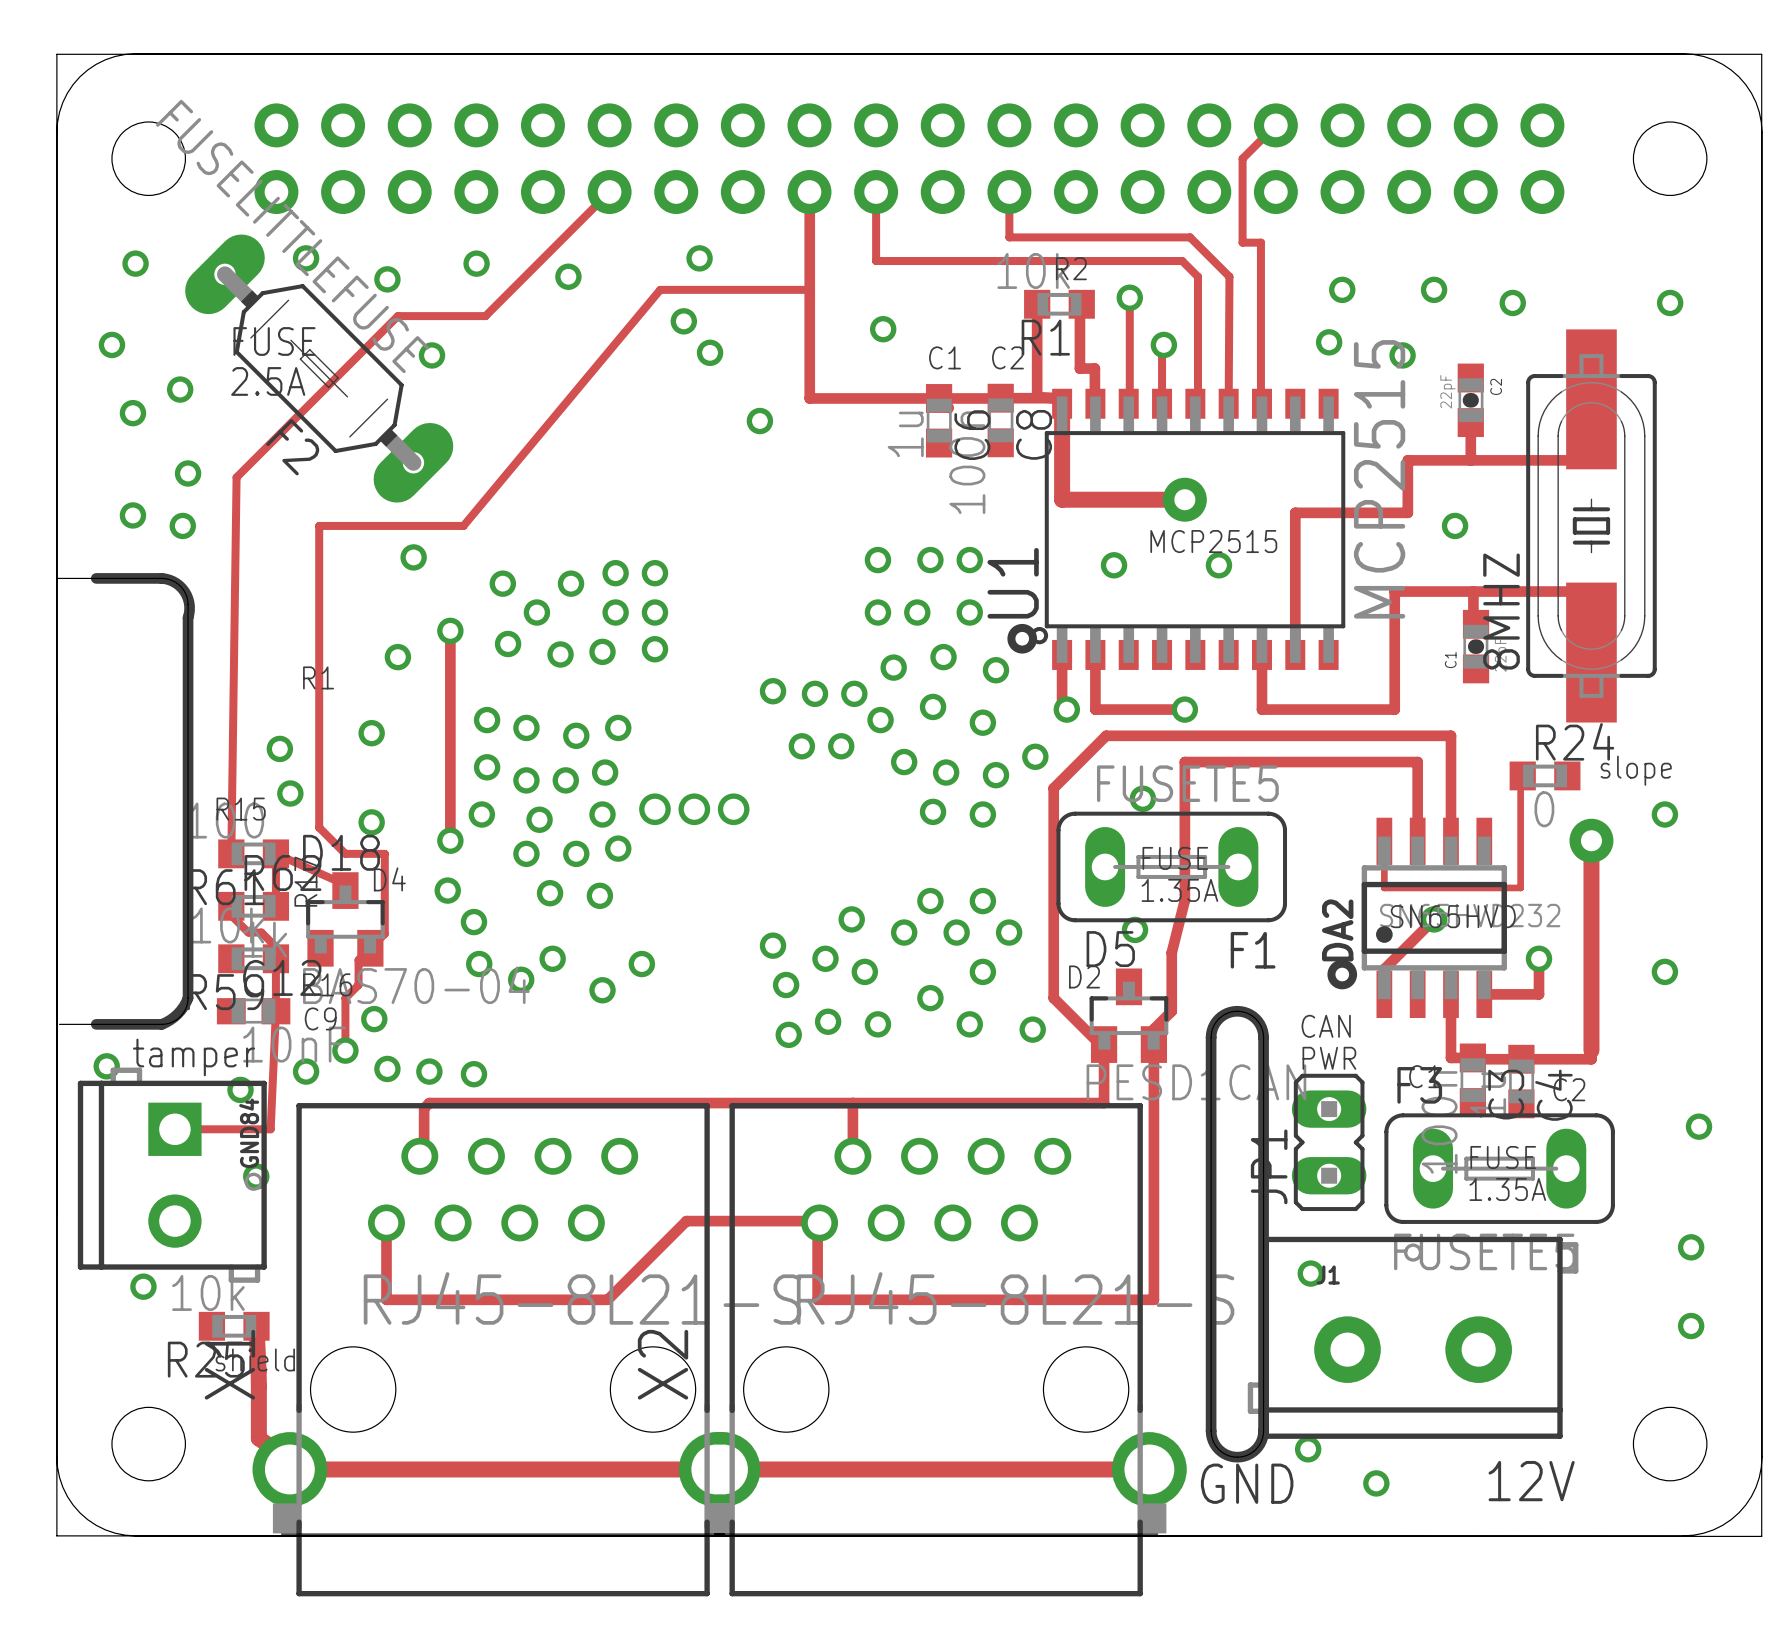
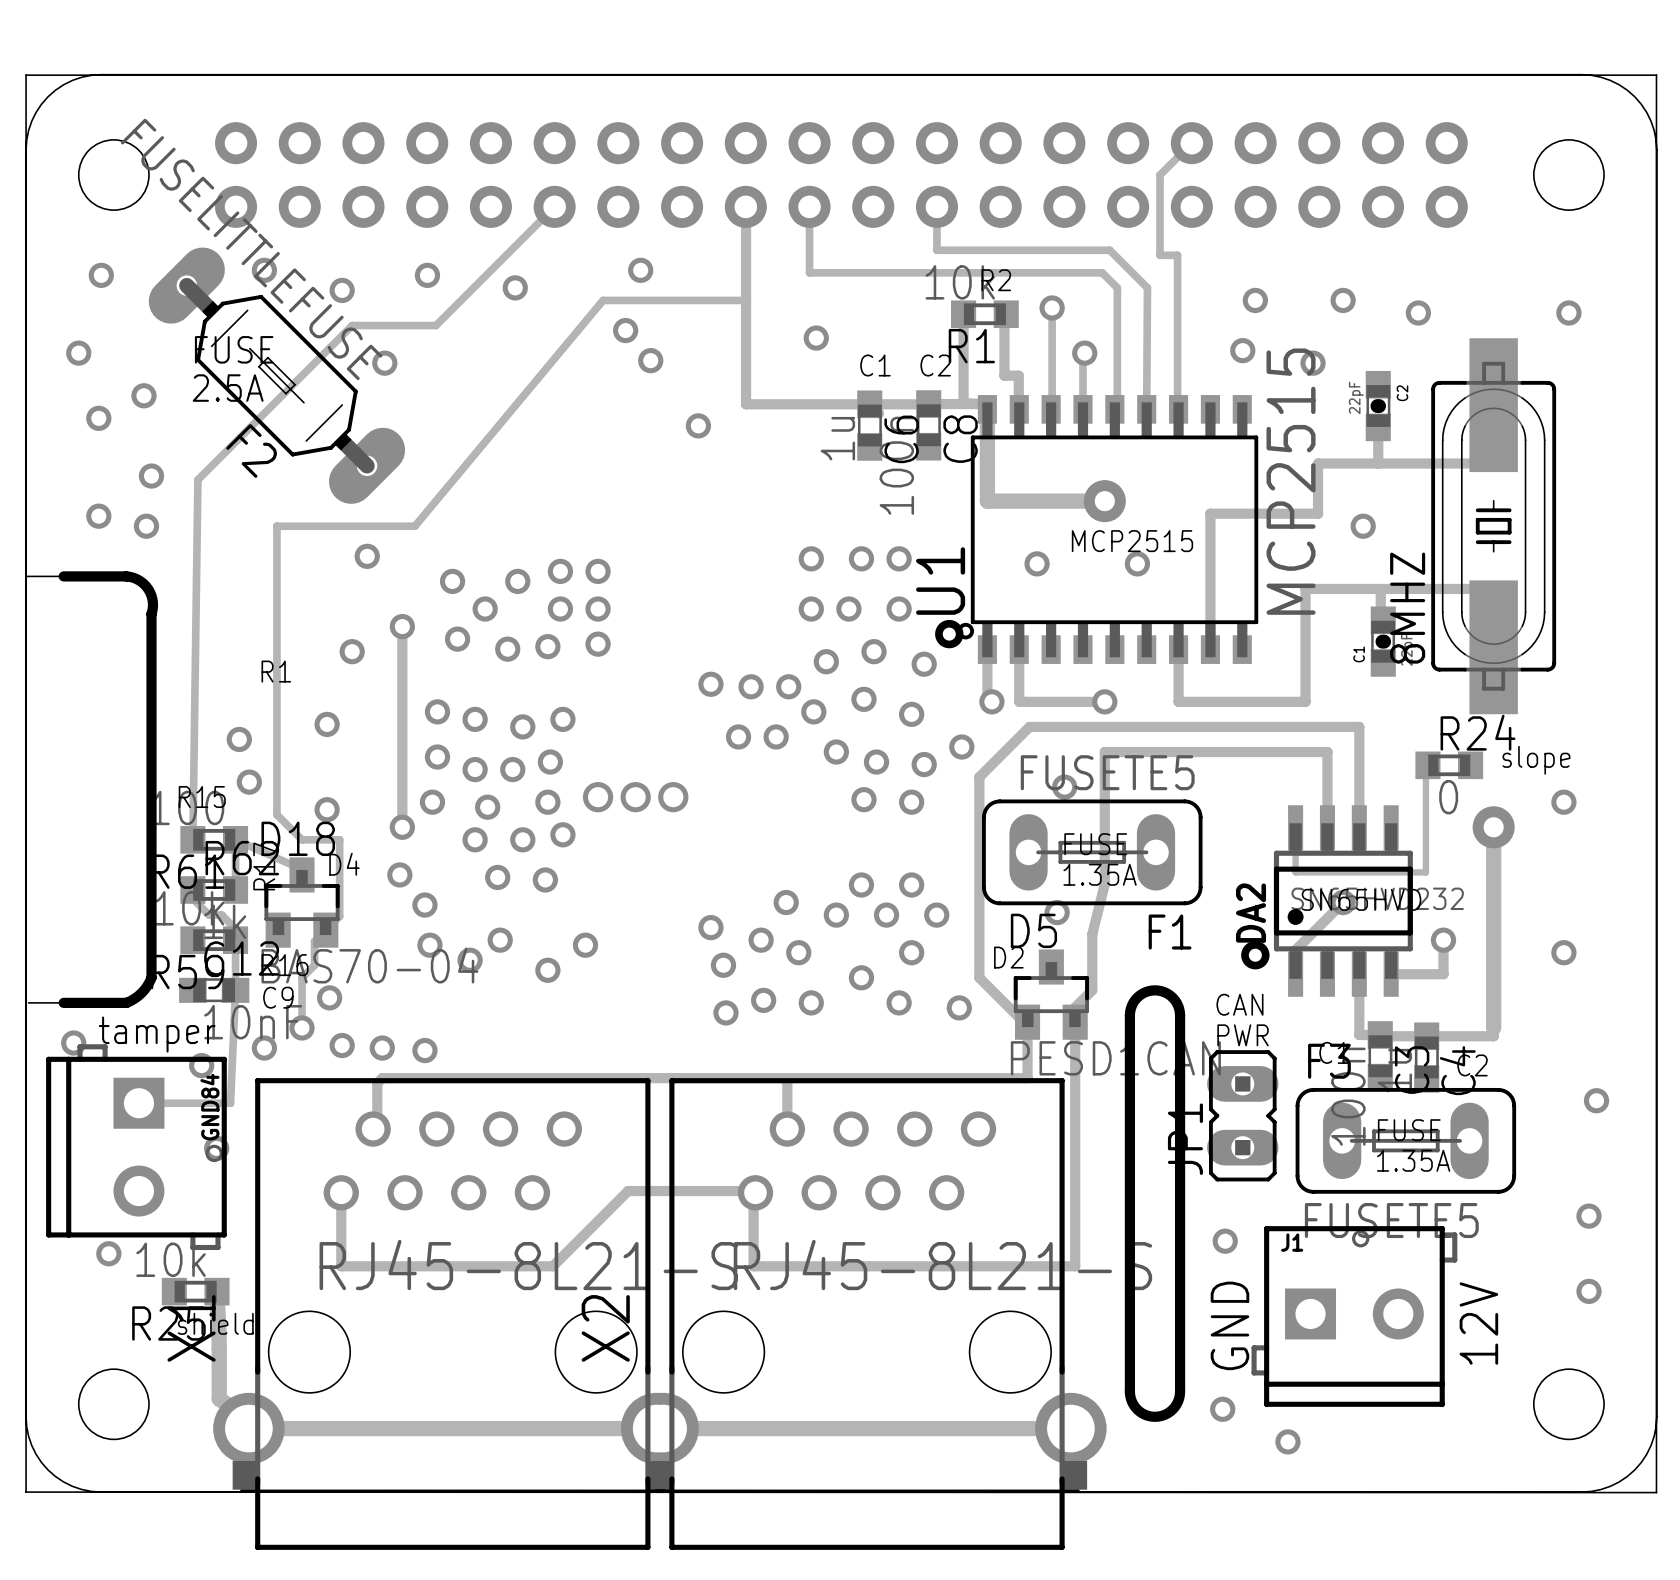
J1 footprint: [1247, 1236, 1579, 1439] -> [1251, 1226, 1458, 1407]
text rotation: 0° (1531, 1481) -> 90° counterclockwise (1478, 1323)
text position: 12V (1531, 1481) -> 12V (1478, 1323)
text rotation: 0° (1247, 1483) -> 90° counterclockwise (1229, 1325)
text position: GND (1247, 1483) -> GND (1229, 1325)

